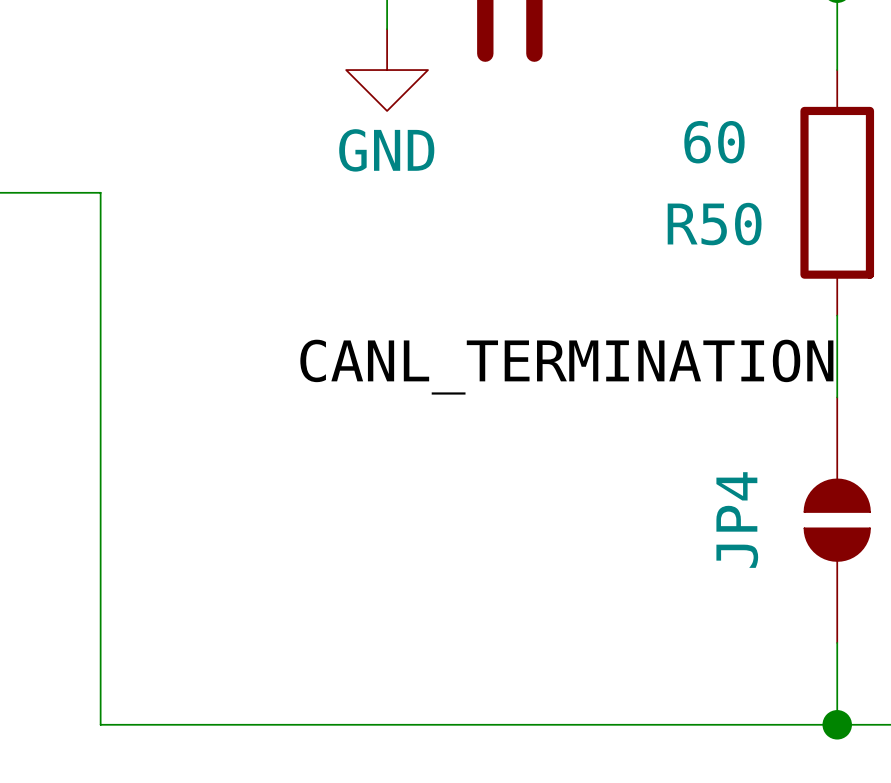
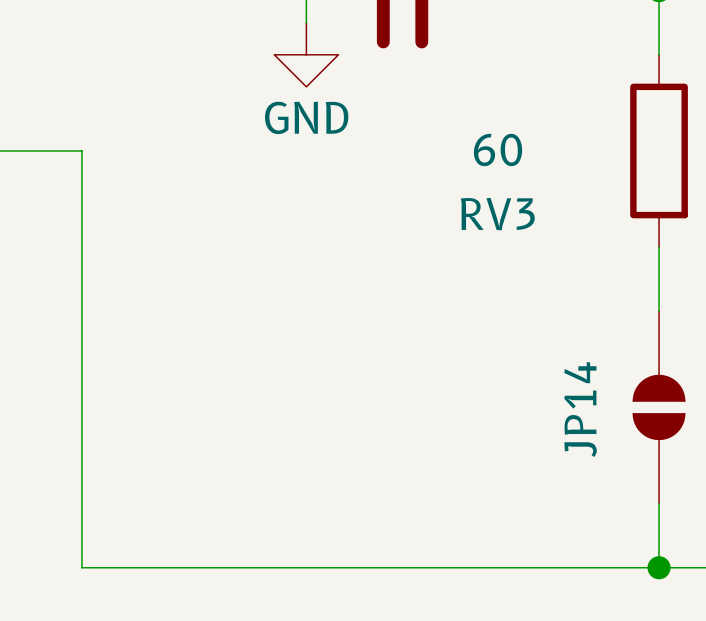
R50 value position: 60 (714, 142) -> 60 (498, 149)
R50 name: R50 (714, 224) -> RV3 (497, 214)
label: CANL_TERMINATION (566, 367) -> none
JP4 name: JP4 (737, 520) -> JP14 (580, 409)

